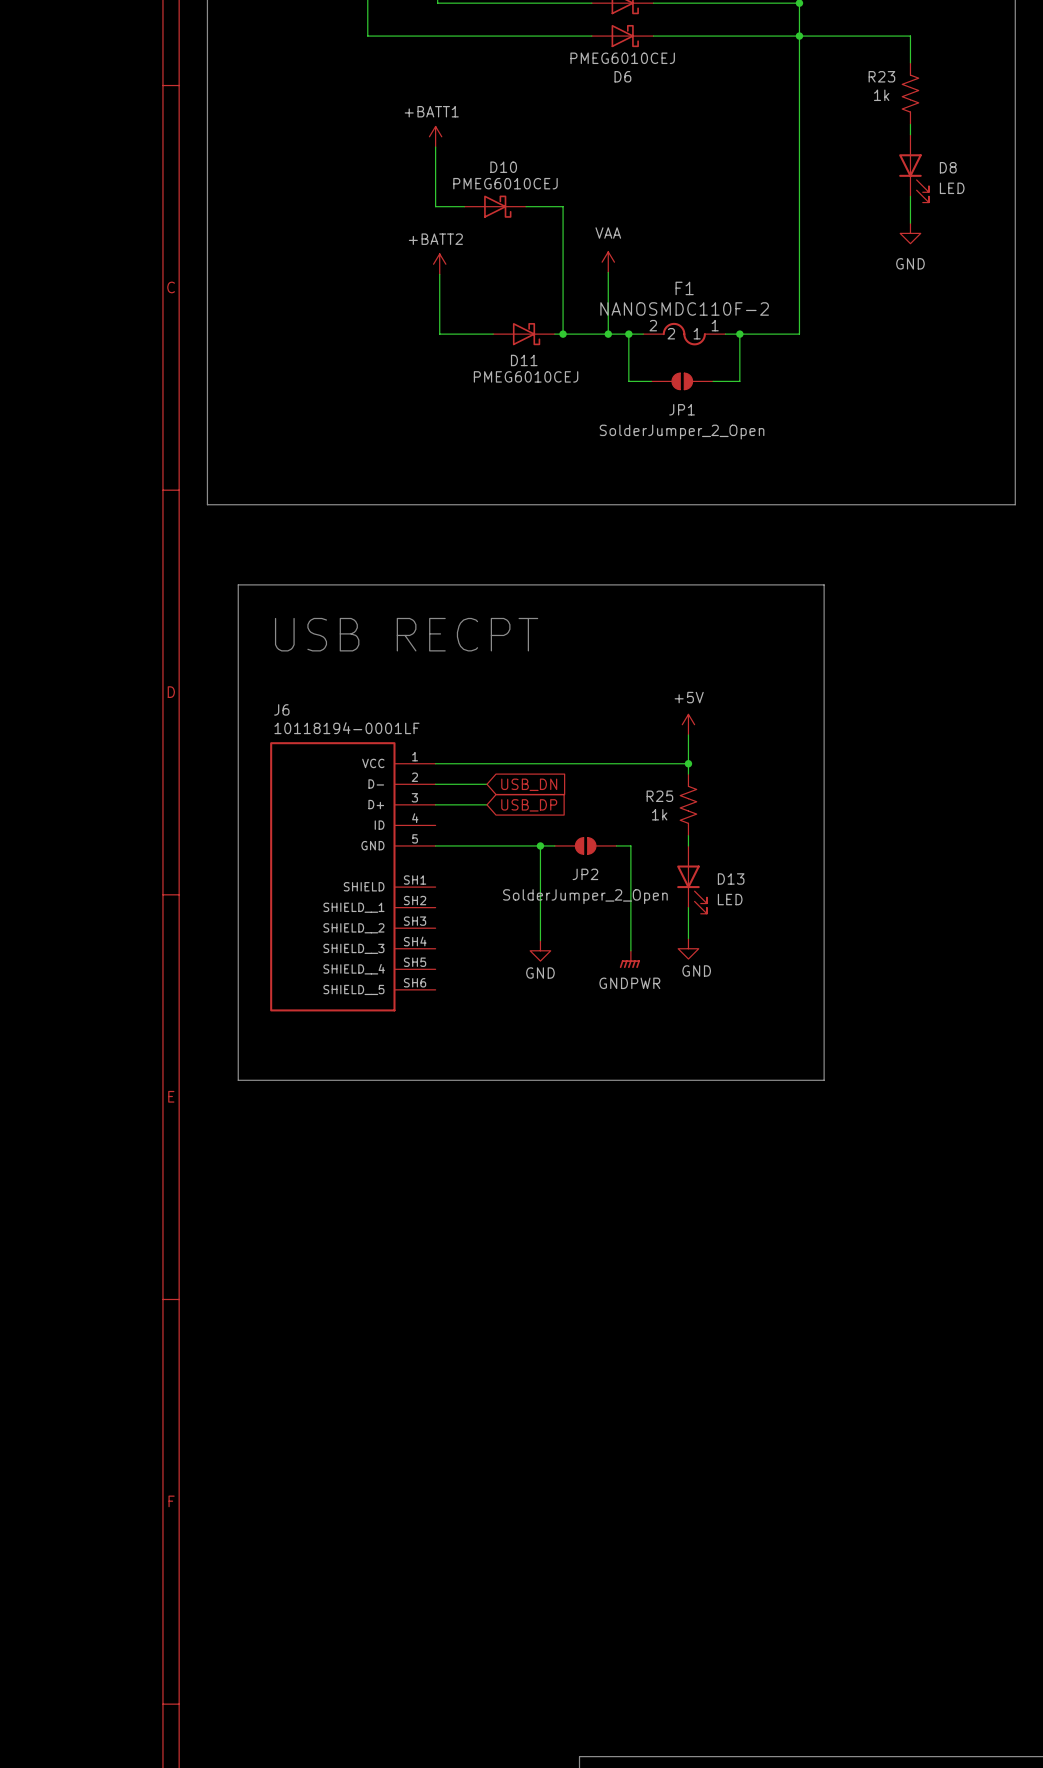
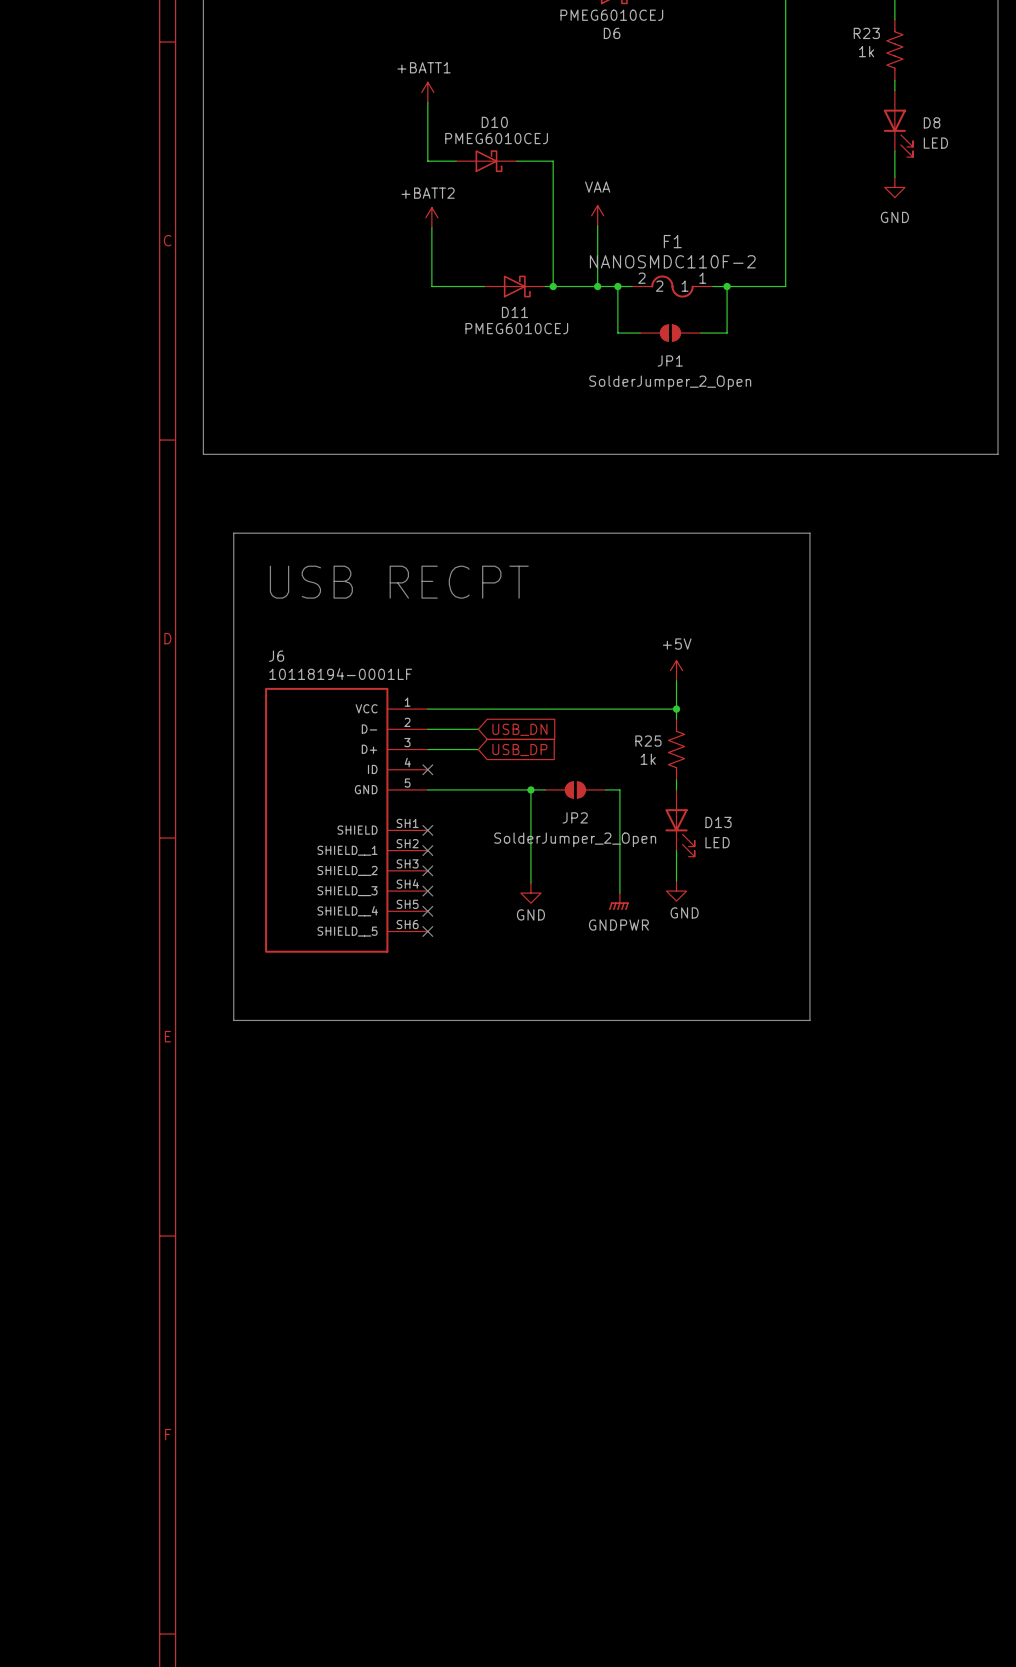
no-connect mark: none -> (427, 769)
no-connect mark: none -> (427, 830)
no-connect mark: none -> (427, 850)
no-connect mark: none -> (427, 870)
no-connect mark: none -> (427, 891)
no-connect mark: none -> (427, 911)
no-connect mark: none -> (427, 931)

